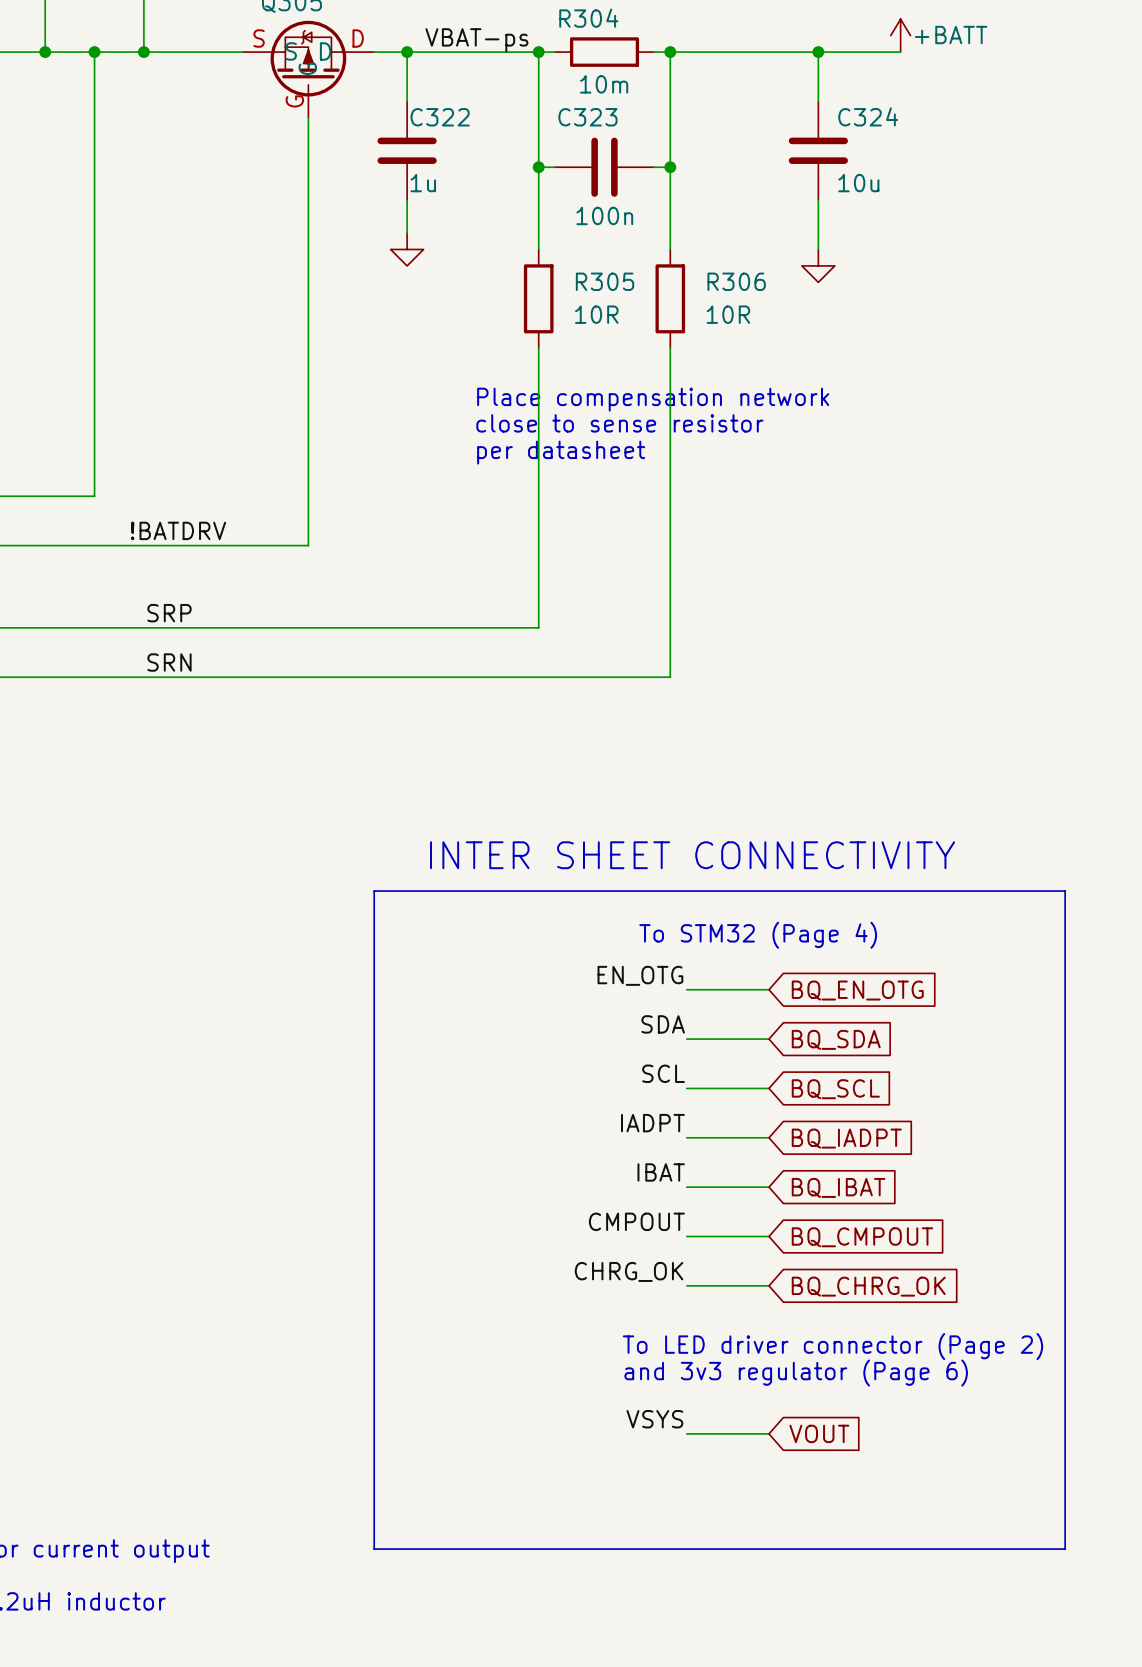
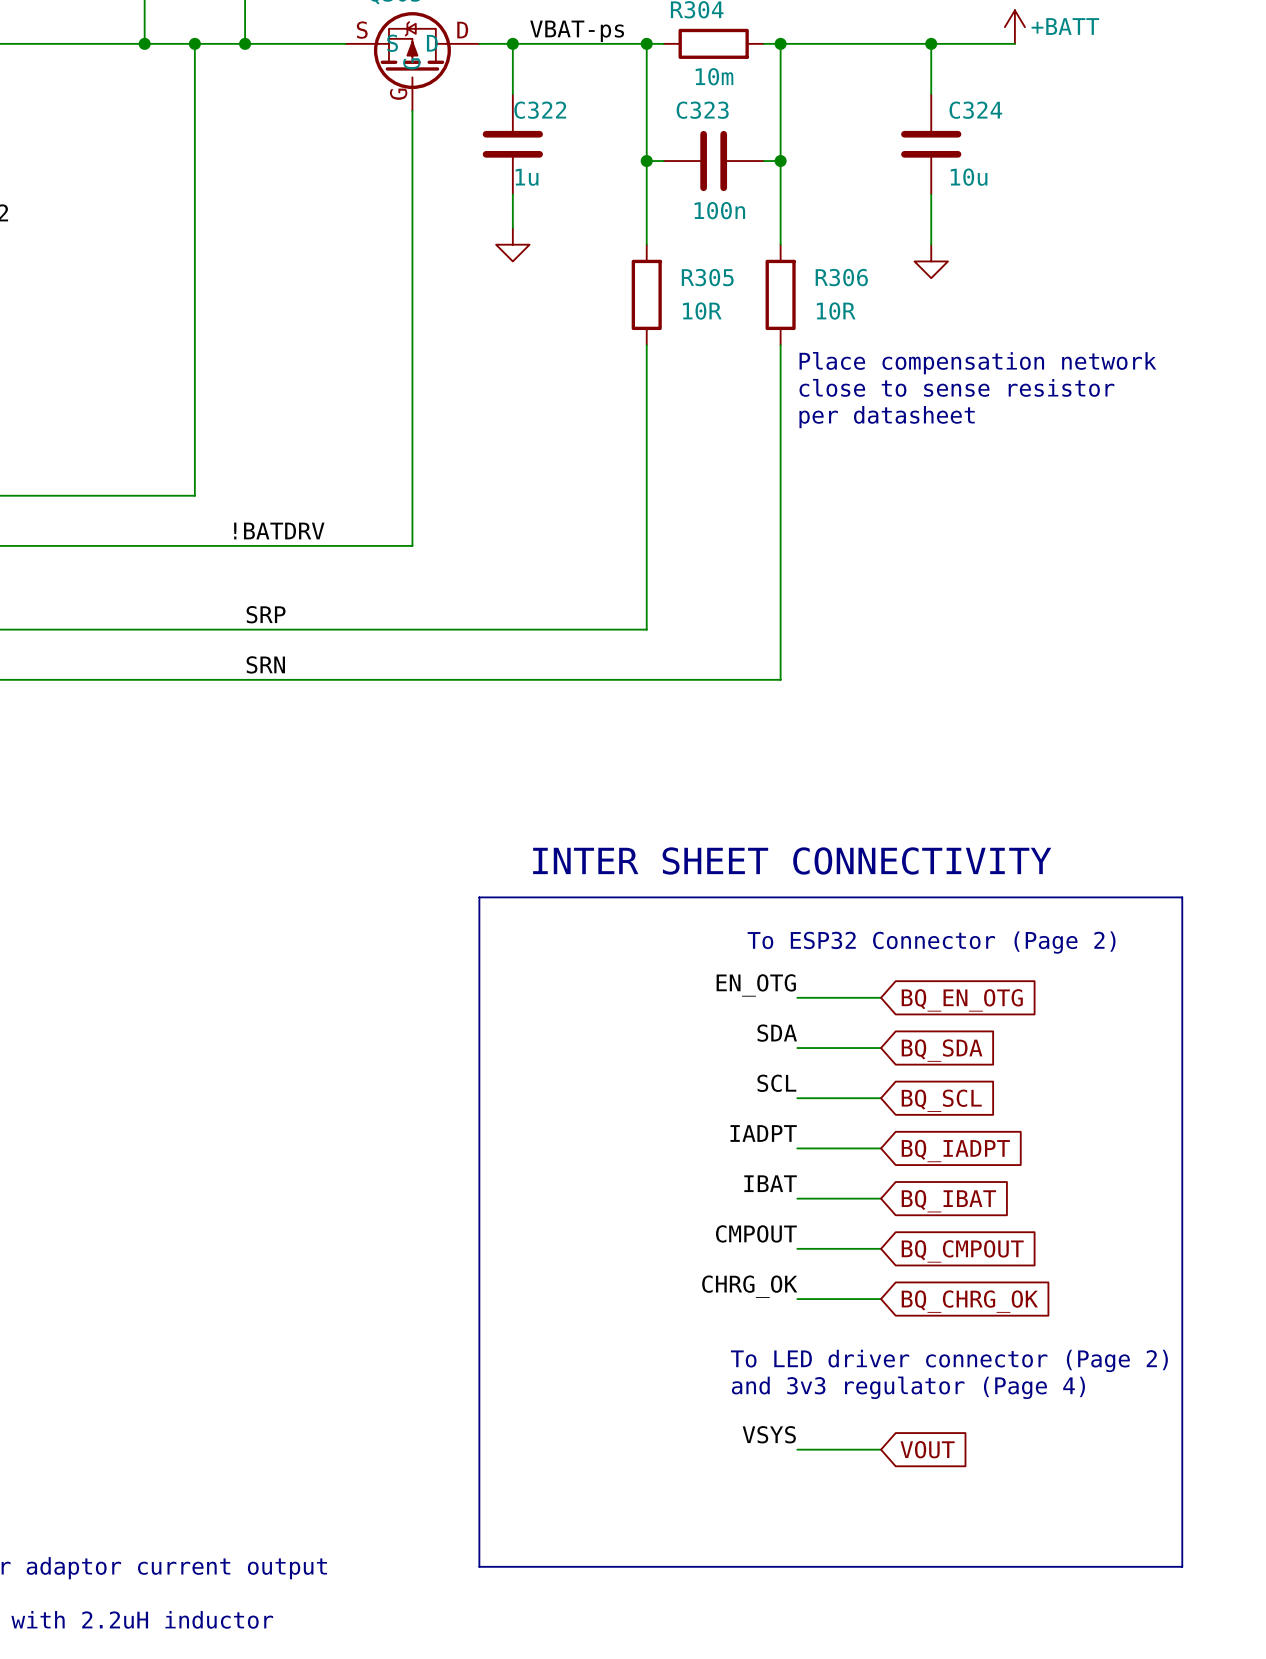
text position: Place compensation network (653, 399) -> Place compensation network (977, 363)
text position: close to sense resistor (619, 423) -> close to sense resistor (956, 387)
text position: per datasheet (561, 452) -> per datasheet (887, 417)
text: To STM32 (Page 4) (758, 935) -> To ESP32 Connector (Page 2) (931, 942)
text: and 3v3 regulator (Page 6) (796, 1373) -> and 3v3 regulator (Page 4) (908, 1387)

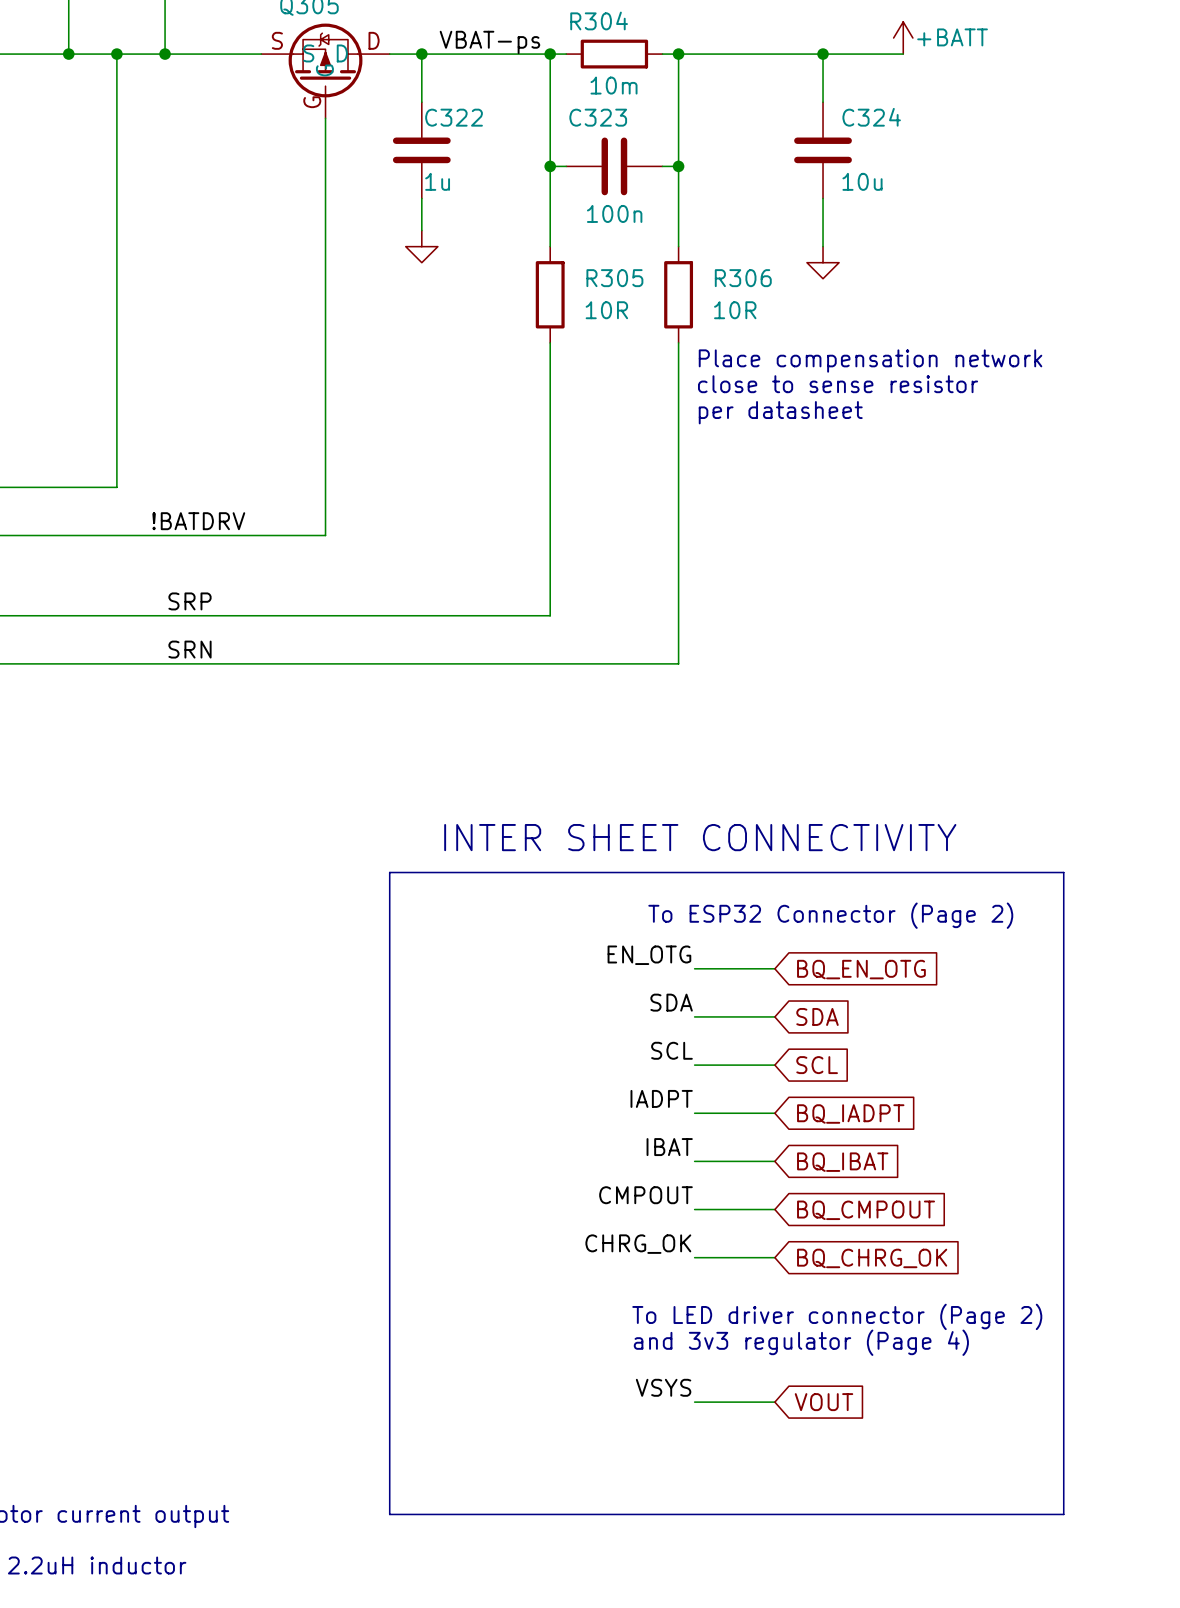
global label: BQ_SDA (942, 1050) -> SDA (817, 1016)
global label: BQ_SCL (941, 1100) -> SCL (817, 1065)

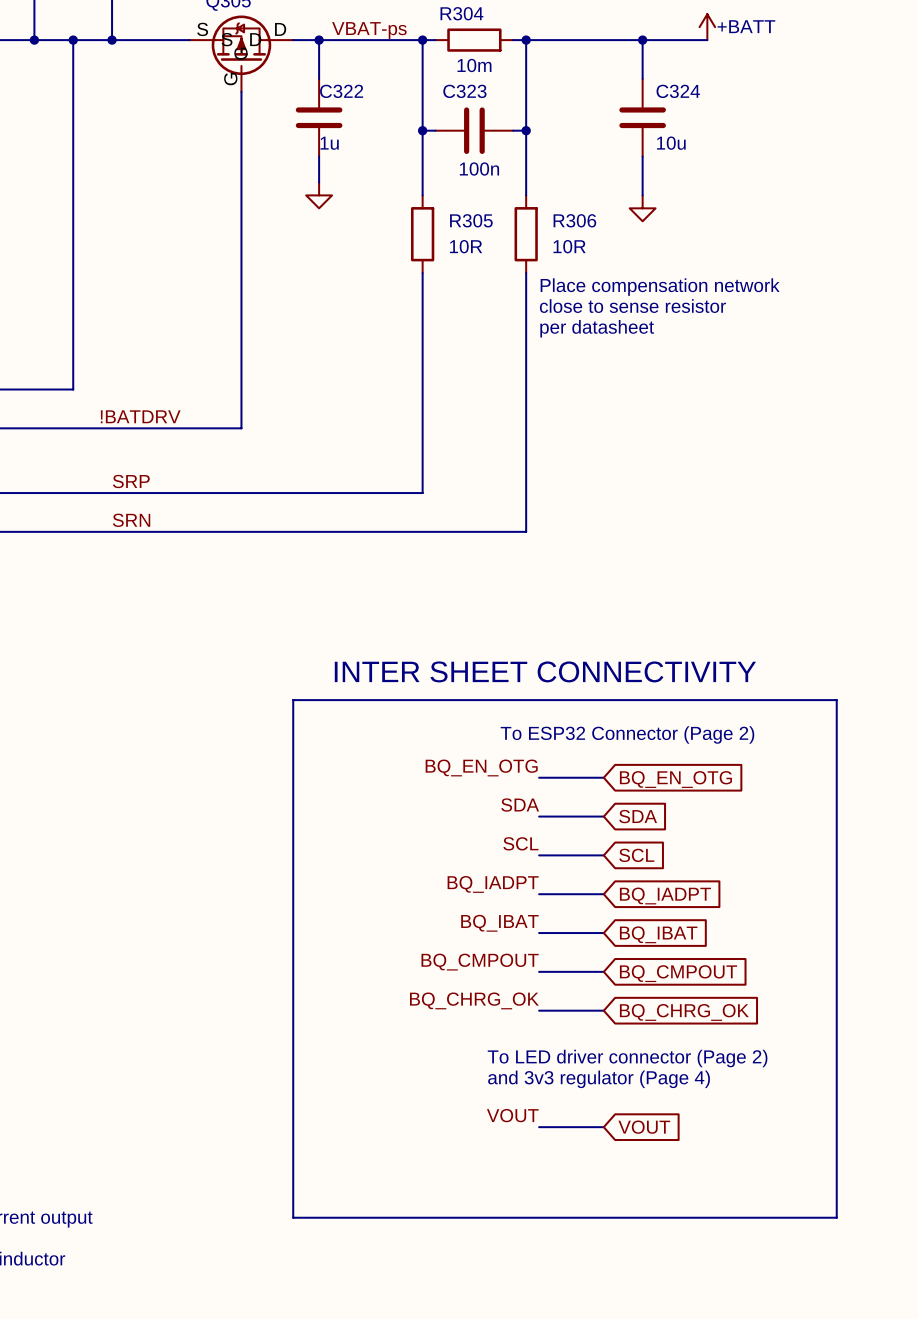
label: EN_OTG (649, 955) -> BQ_EN_OTG (481, 767)
label: IADPT (661, 1098) -> BQ_IADPT (493, 884)
label: IBAT (669, 1147) -> BQ_IBAT (499, 923)
label: CMPOUT (645, 1195) -> BQ_CMPOUT (480, 962)
label: CHRG_OK (638, 1244) -> BQ_CHRG_OK (474, 1000)
label: VSYS (663, 1387) -> VOUT (512, 1115)

